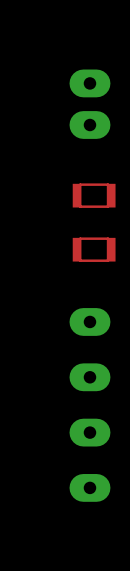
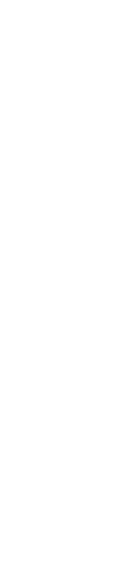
part: (89, 104) -> none
part: (94, 195) -> none
part: (94, 249) -> none
part: (89, 404) -> none

